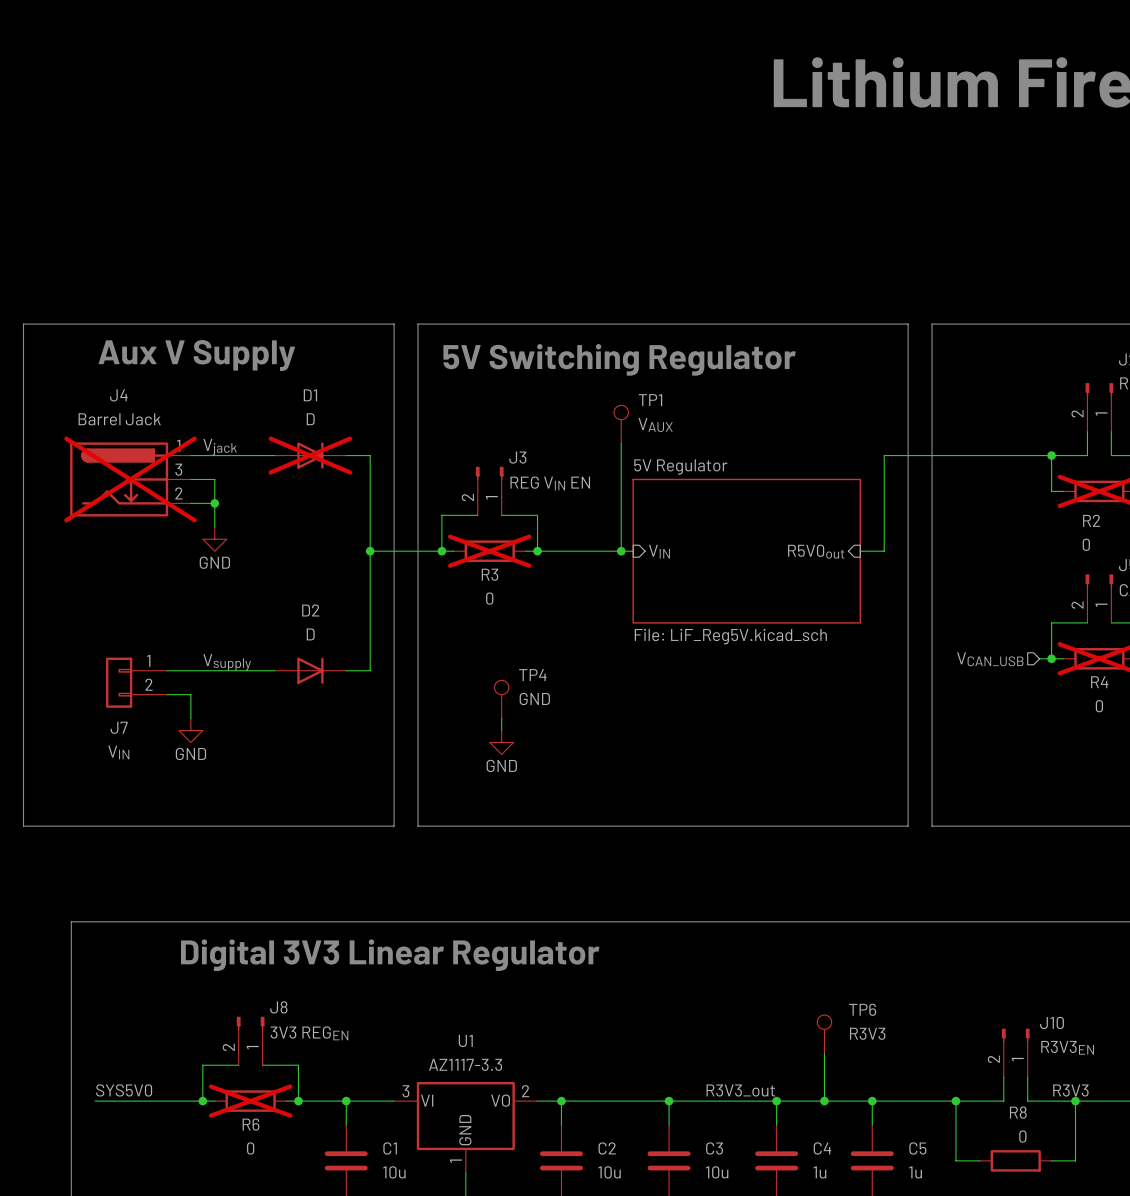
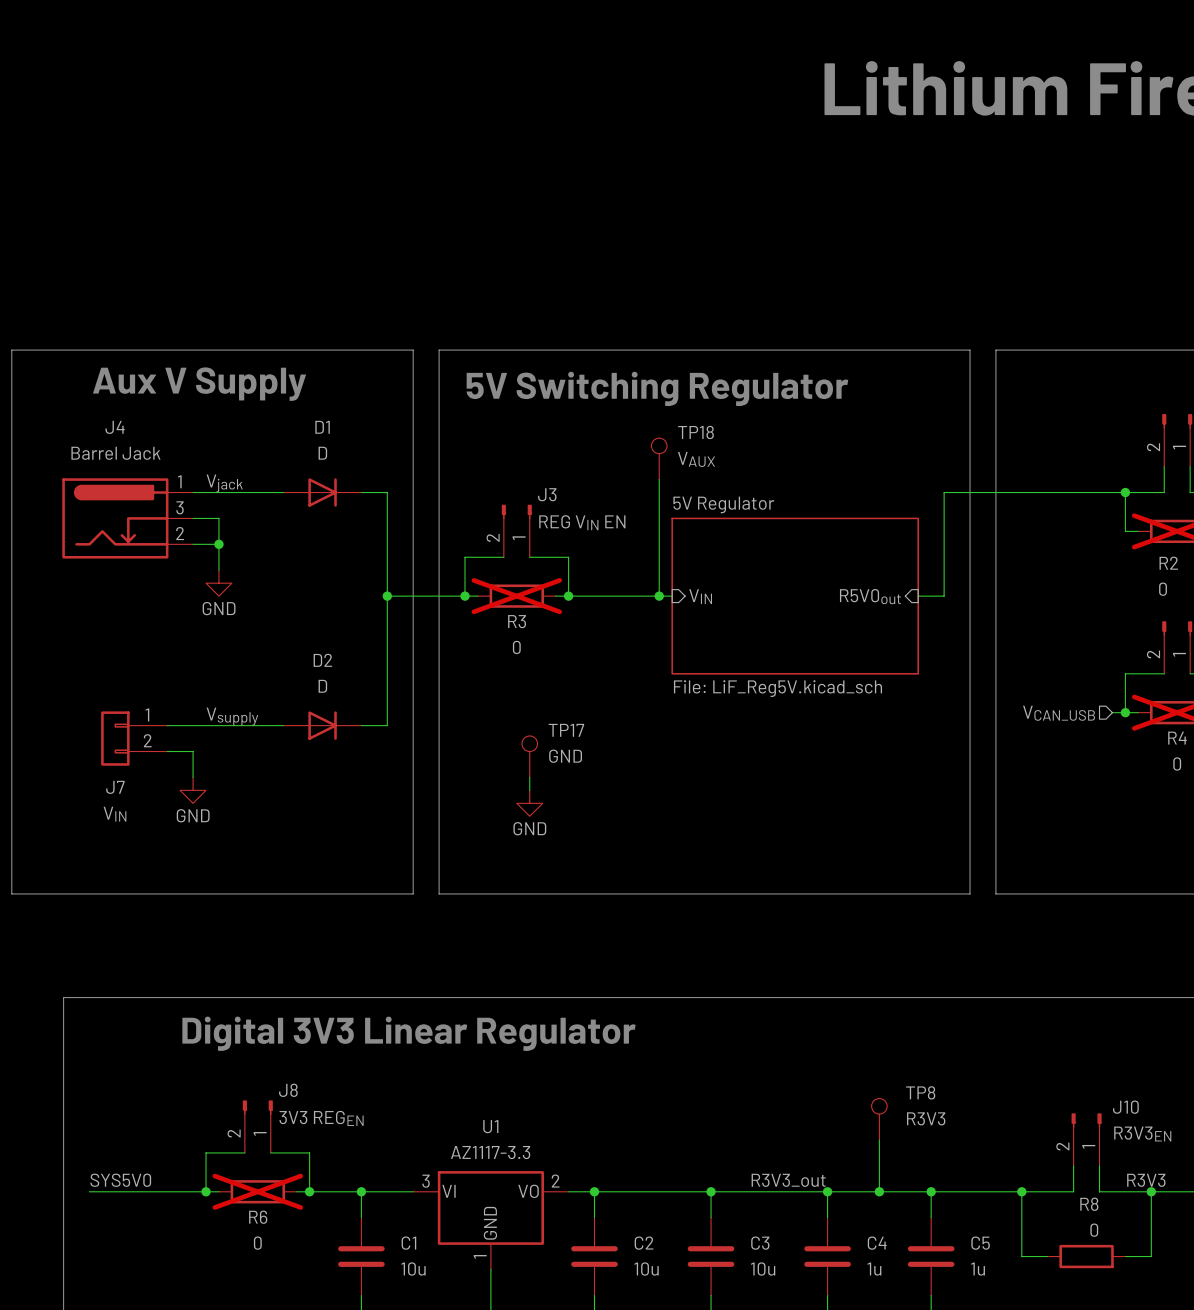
TP1 name: TP1 (650, 400) -> TP18 (696, 432)
D1 do-not-place cross: (310, 455) -> none
J4 do-not-place cross: (130, 479) -> none
TP4 name: TP4 (532, 675) -> TP17 (566, 730)
TP6 name: TP6 (862, 1009) -> TP8 (920, 1092)

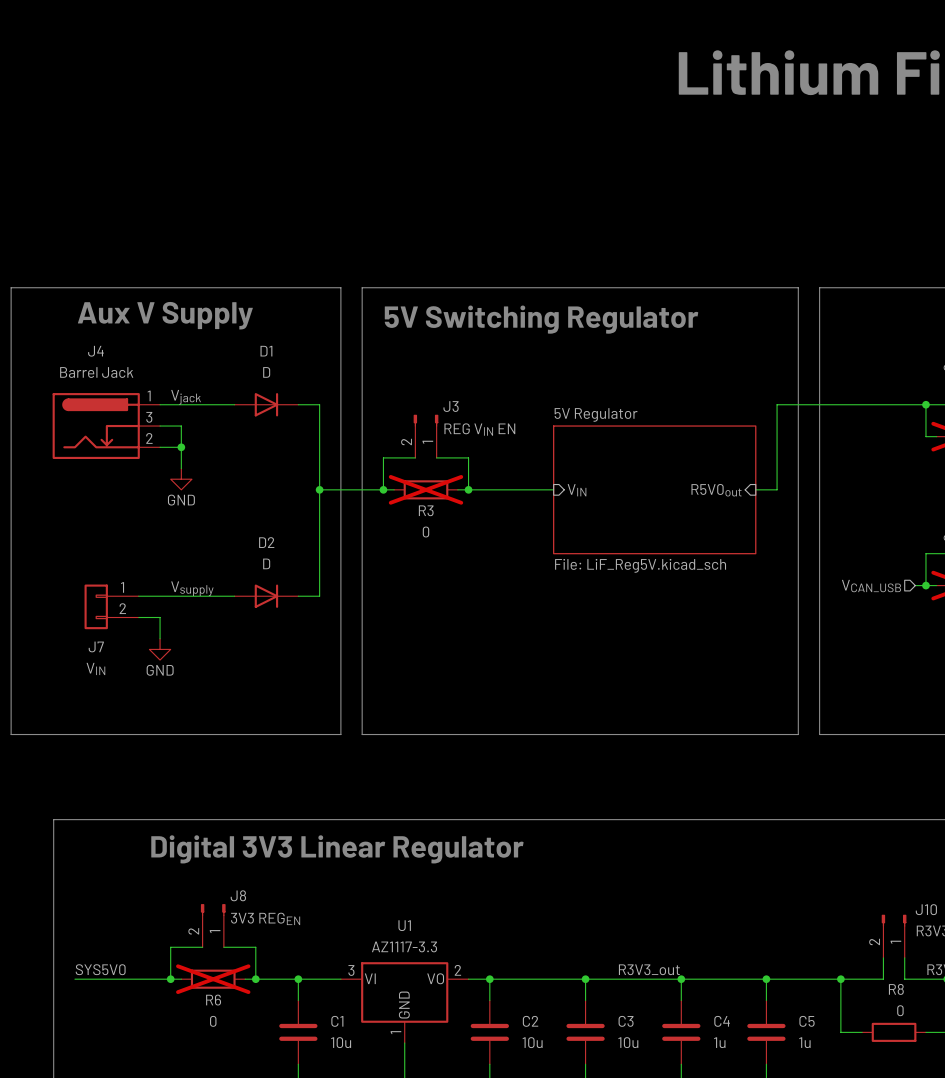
TP18: VAUX (659, 458) -> none
wire: (659, 479) (659, 596) -> none
junction: (659, 596) -> none
TP17: GND (529, 756) -> none
wire: (529, 777) (529, 790) -> none
power symbol: GND (529, 803) -> none
TP8: R3V3 (879, 1119) -> none
wire: (879, 1139) (879, 1191) -> none
junction: (879, 1191) -> none

